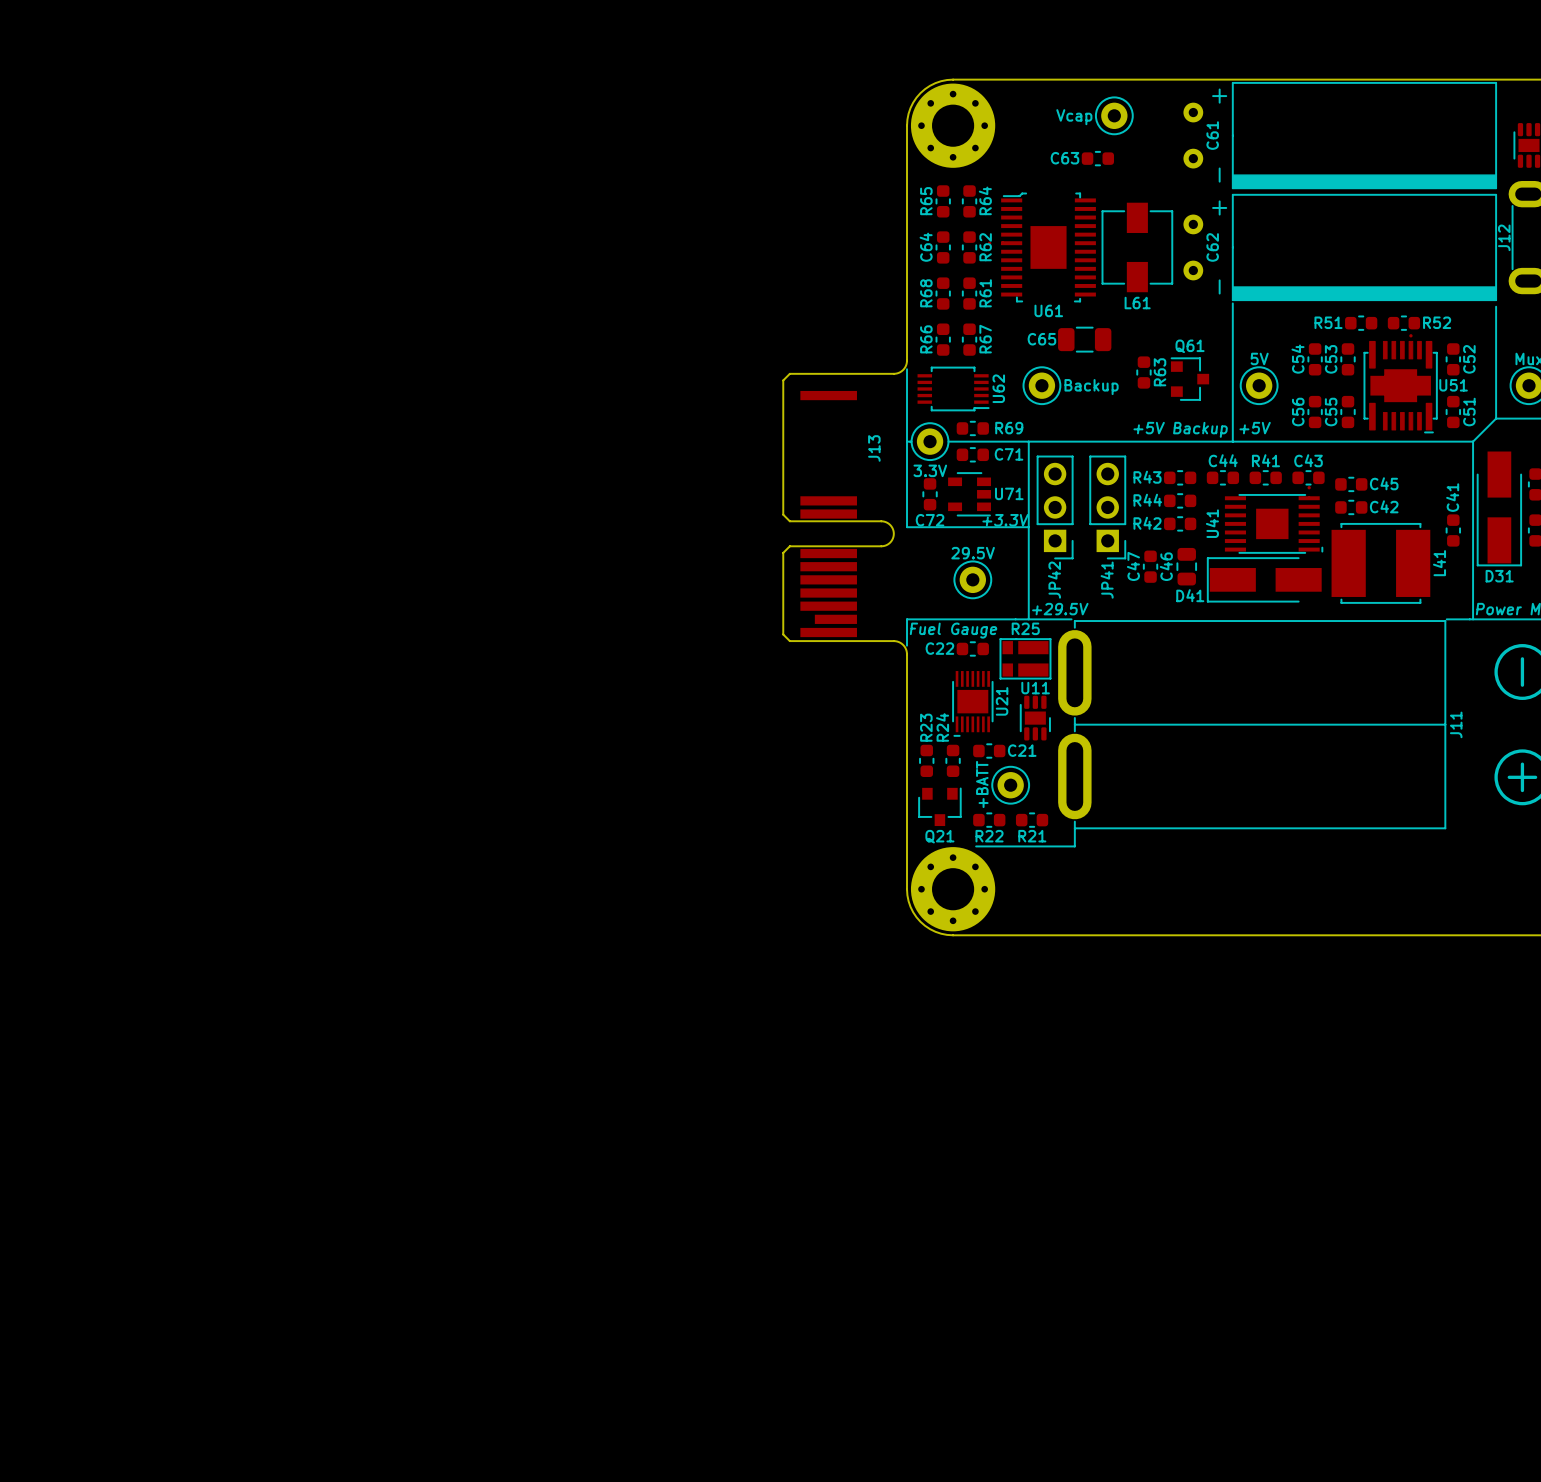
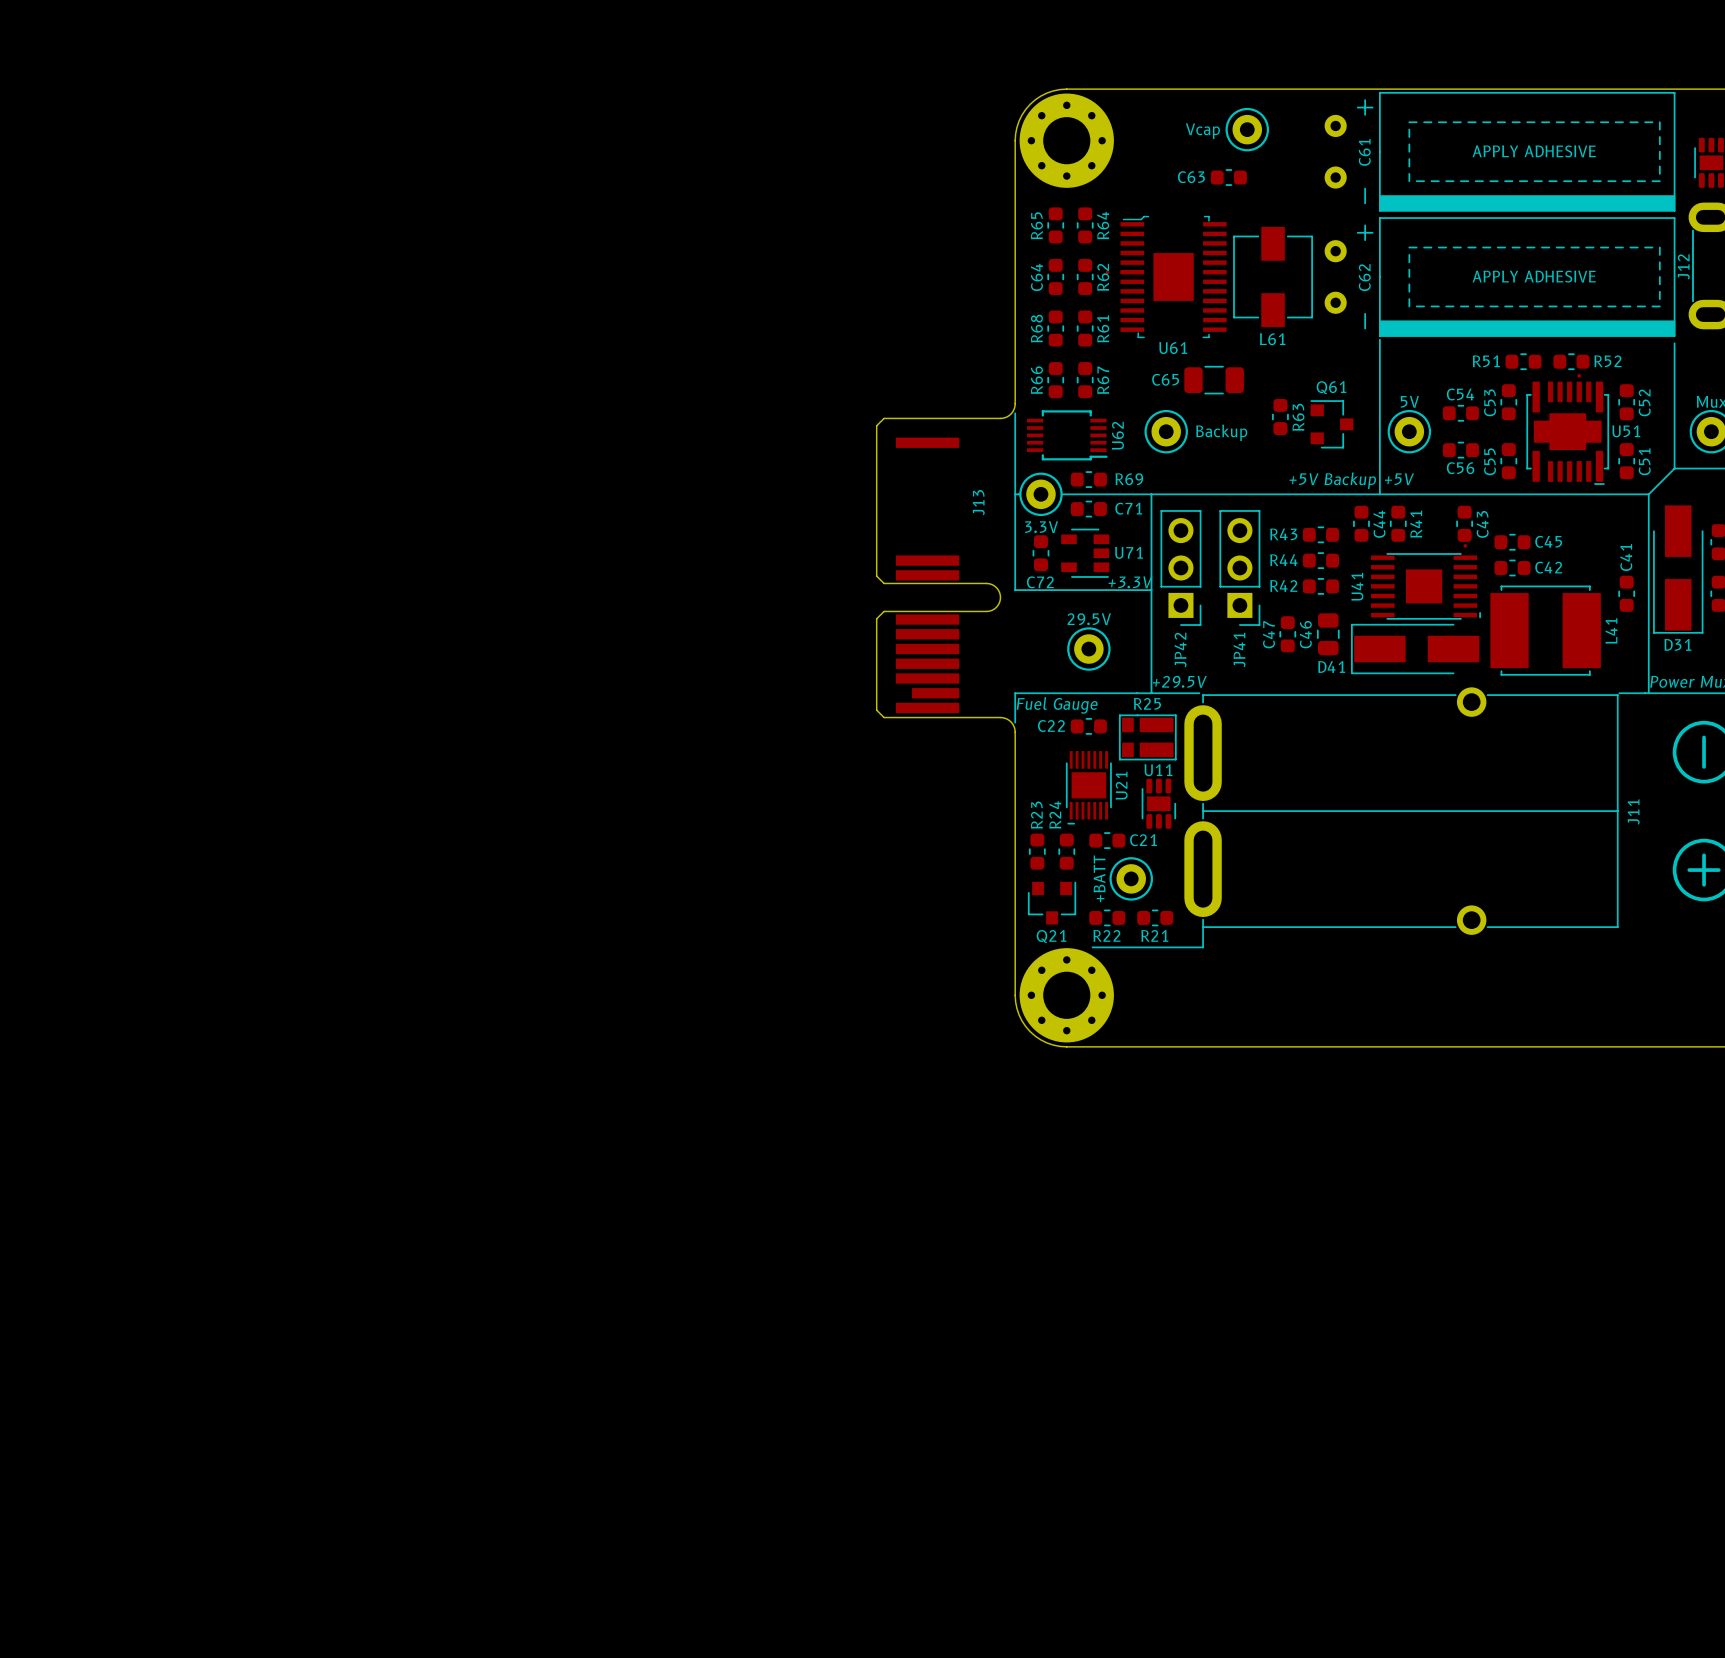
C61 footprint: [1183, 82, 1497, 190] -> [1324, 91, 1676, 212]
C62 footprint: [1183, 194, 1497, 301] -> [1324, 217, 1676, 337]
C54 rotation: 0° (1315, 359) -> 90° clockwise (1460, 413)
C56 rotation: 0° (1315, 412) -> 90° clockwise (1460, 450)
C44 rotation: 0° (1222, 477) -> 90° clockwise (1361, 523)
R41 rotation: 0° (1265, 477) -> 90° clockwise (1398, 523)
C43 rotation: 0° (1308, 477) -> 90° clockwise (1464, 523)
J11 footprint: [1058, 620, 1447, 830] -> [1184, 687, 1619, 935]

